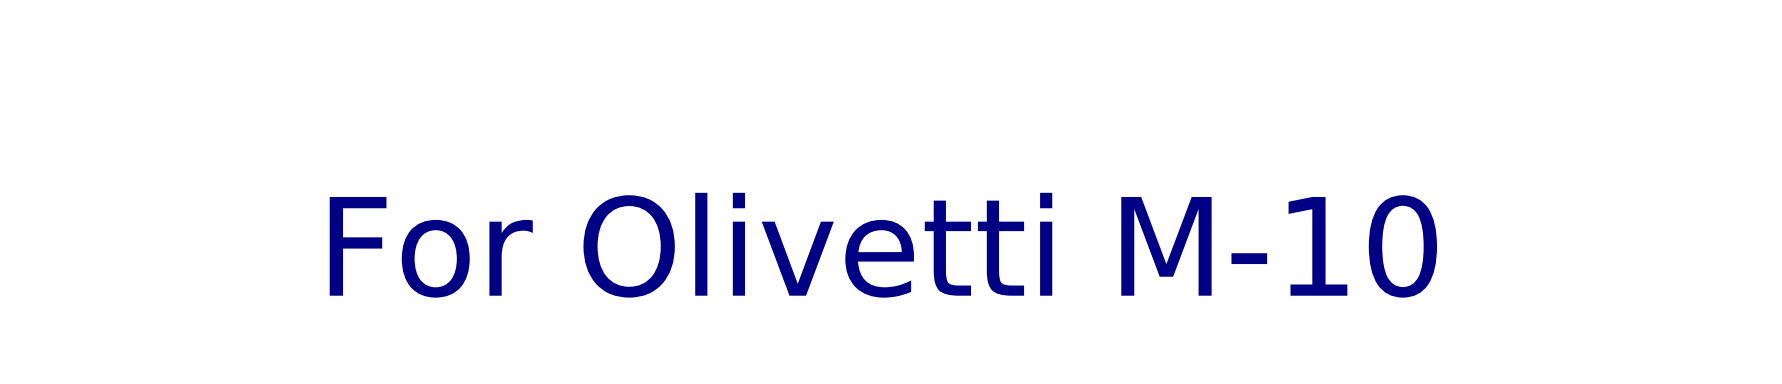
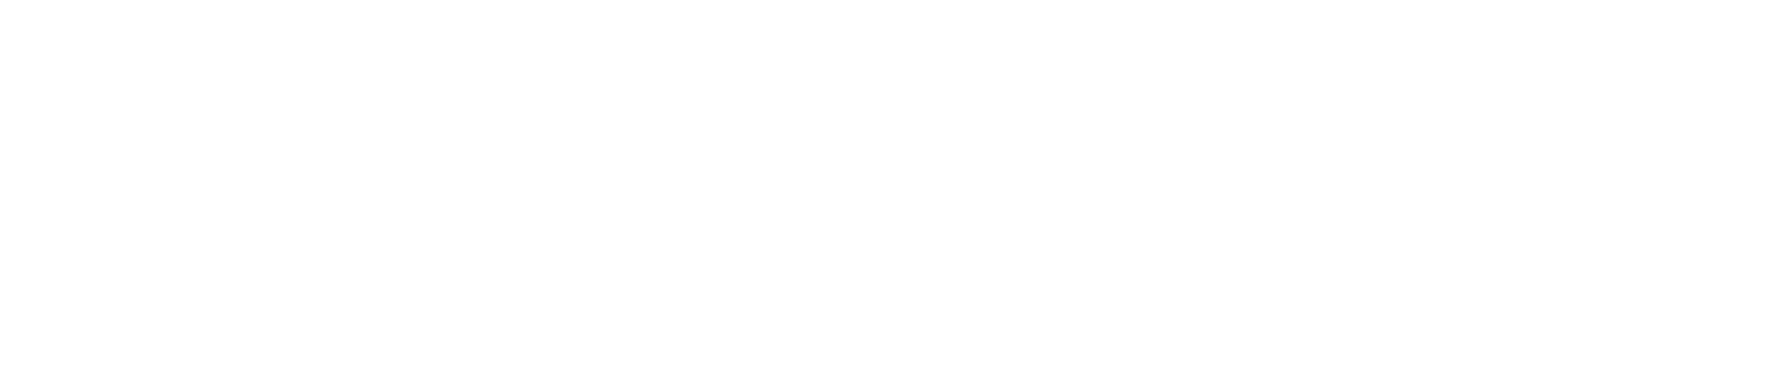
text: For Olivetti M-10 (883, 245) -> none

